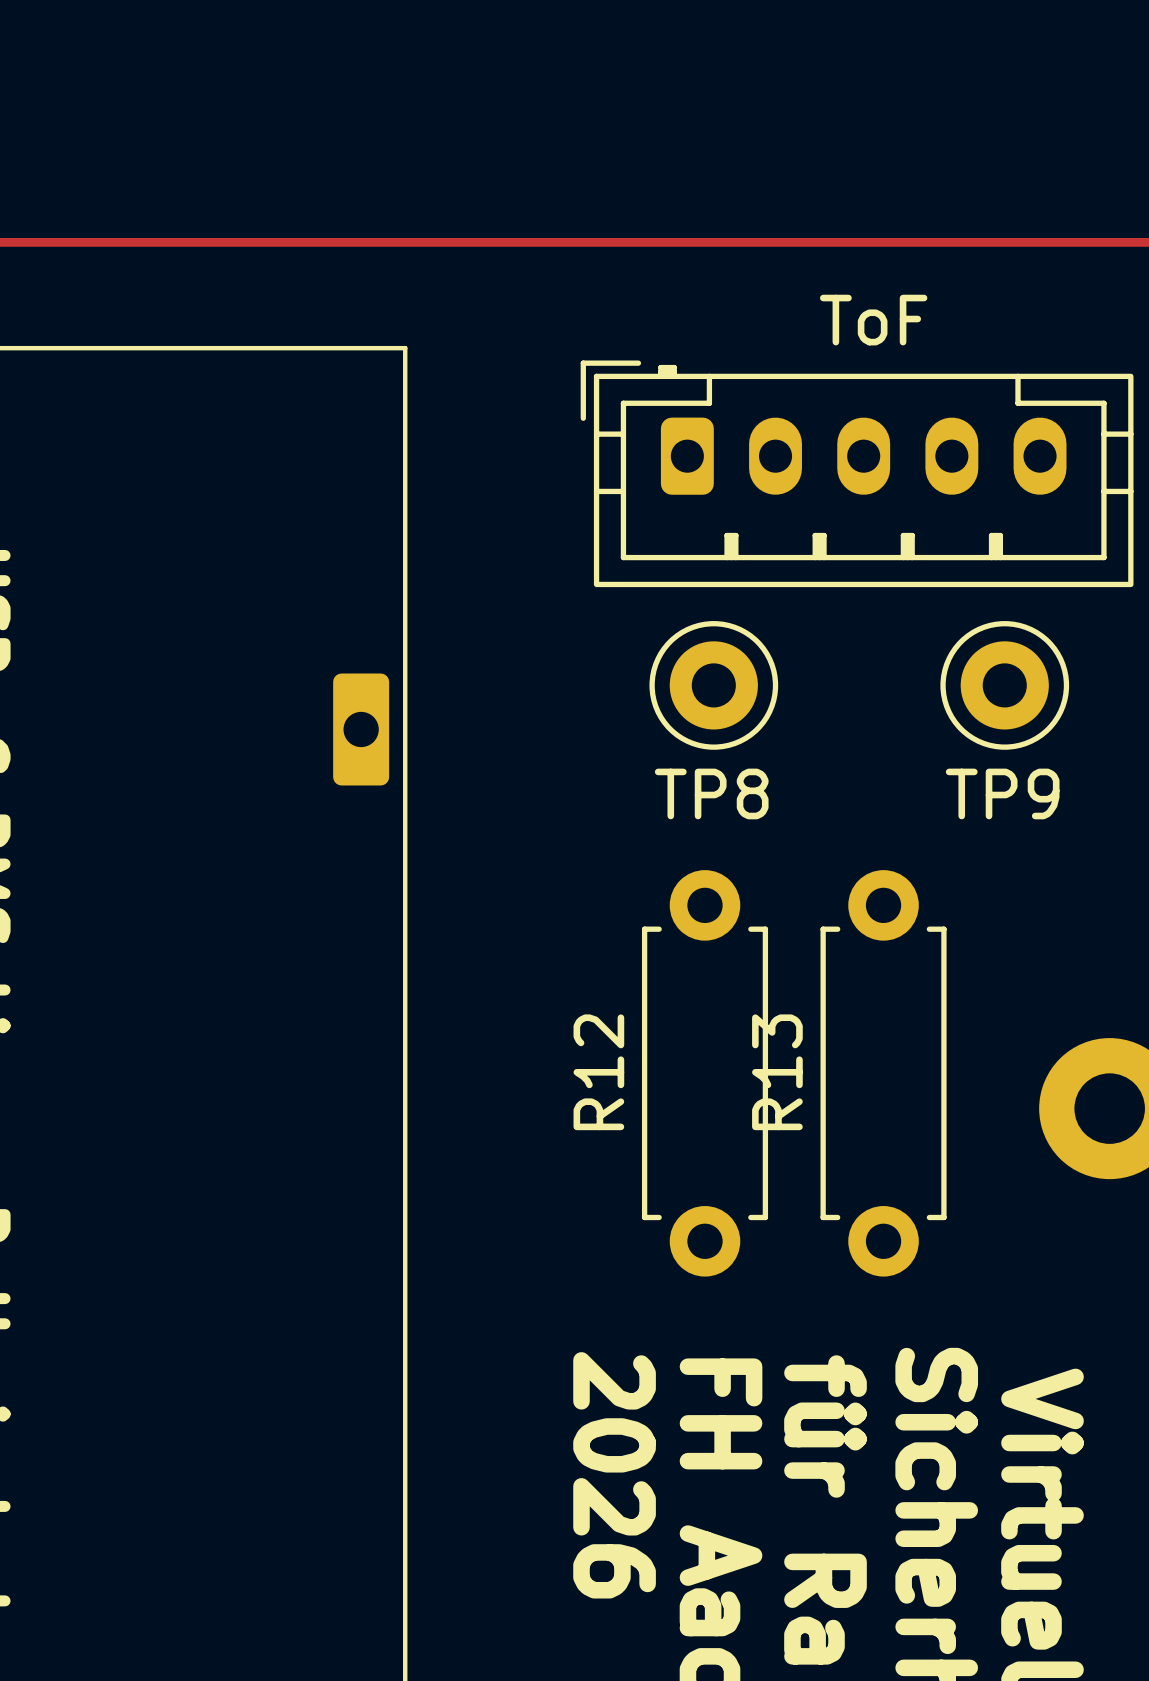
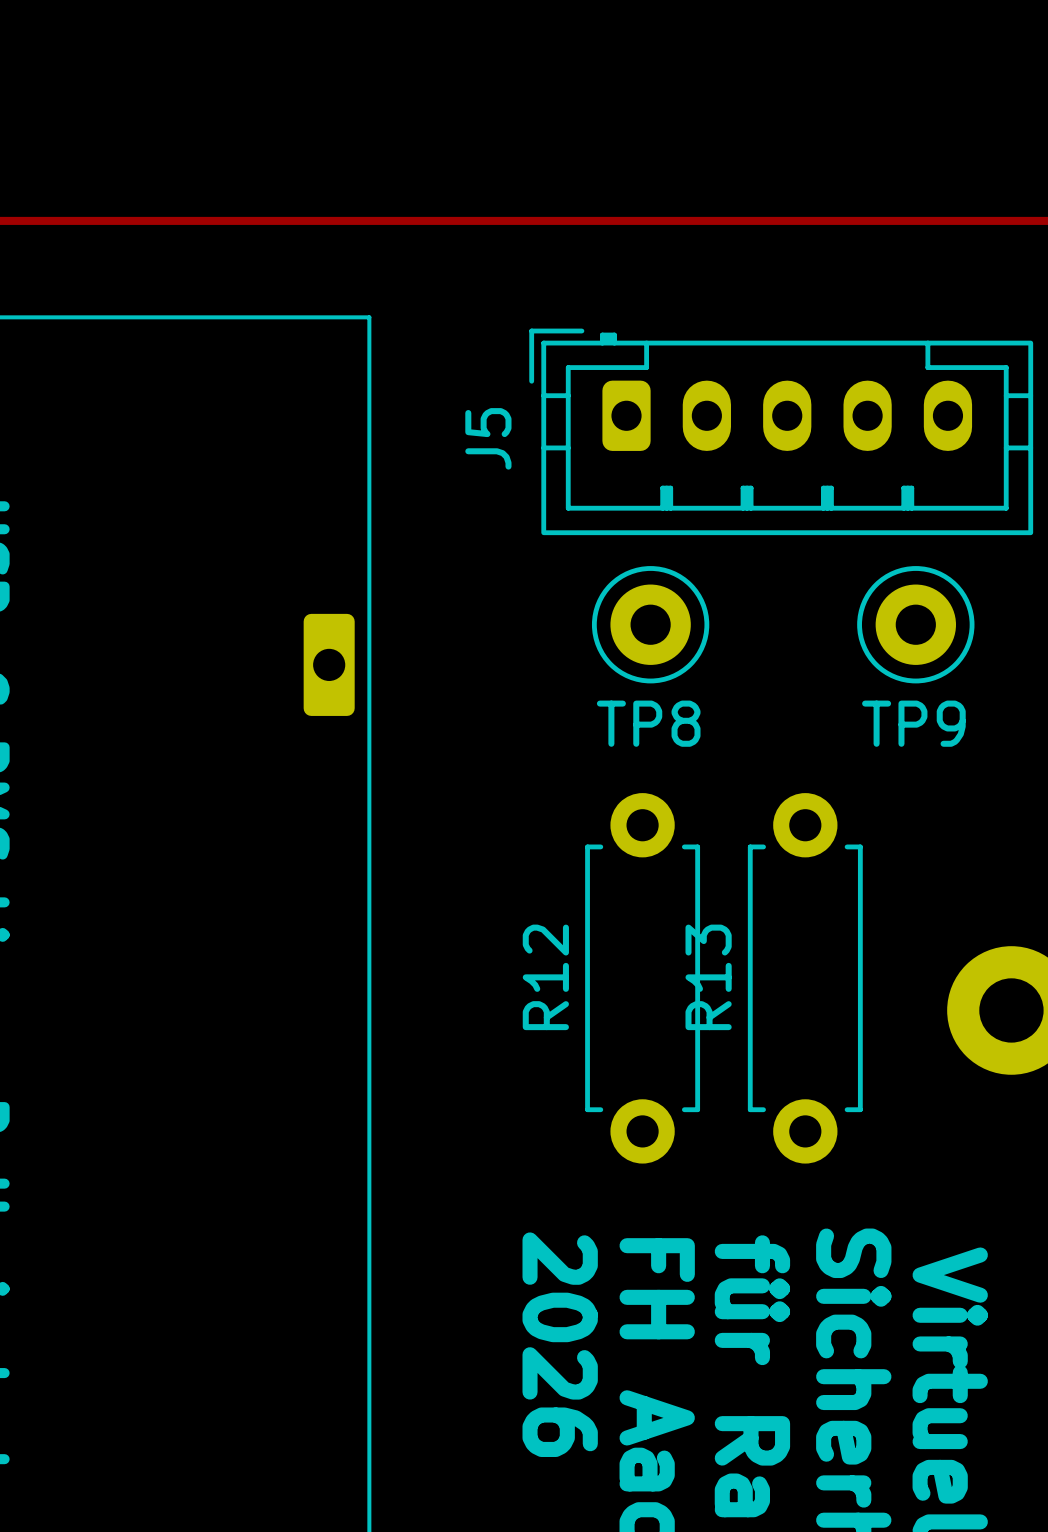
ToF name: ToF (873, 320) -> J5 (488, 438)

